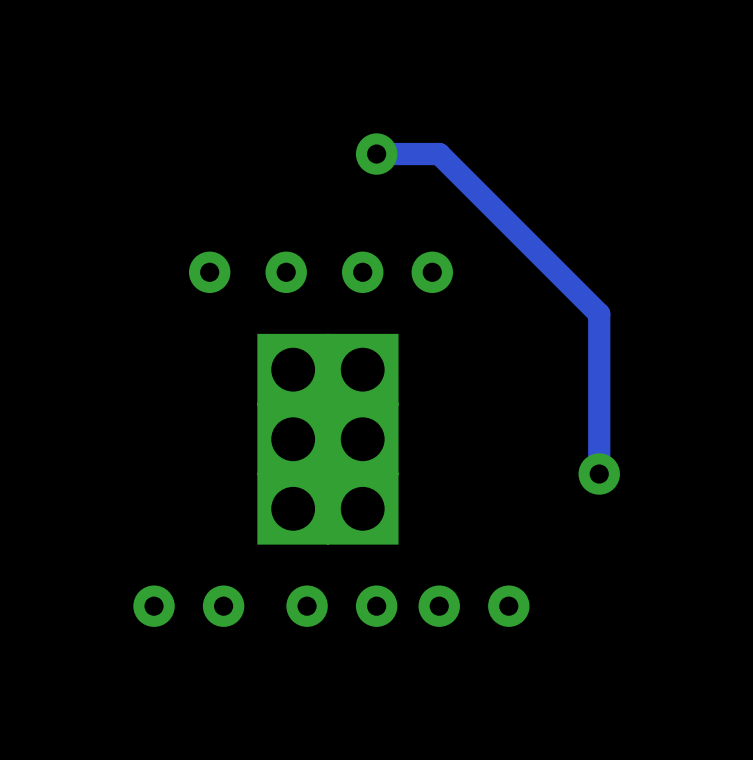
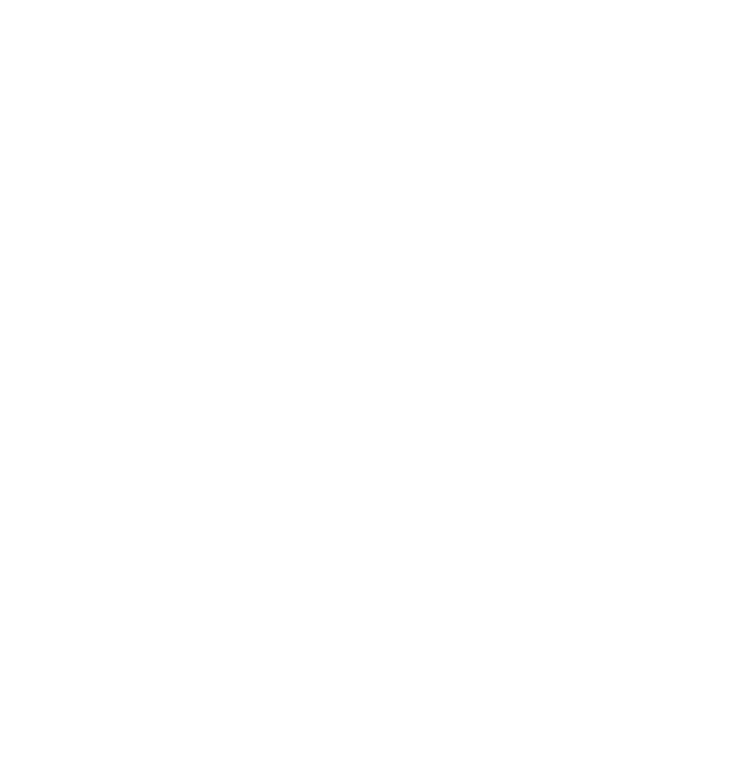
track: (376, 154) (439, 154) (599, 314) (599, 474) -> none
via: (376, 154) -> none
via: (209, 272) -> none
via: (286, 272) -> none
via: (362, 272) -> none
via: (432, 272) -> none
part: (327, 439) -> none
via: (599, 474) -> none
via: (154, 606) -> none
via: (223, 606) -> none
via: (307, 606) -> none
via: (376, 606) -> none
via: (439, 606) -> none
via: (508, 606) -> none

